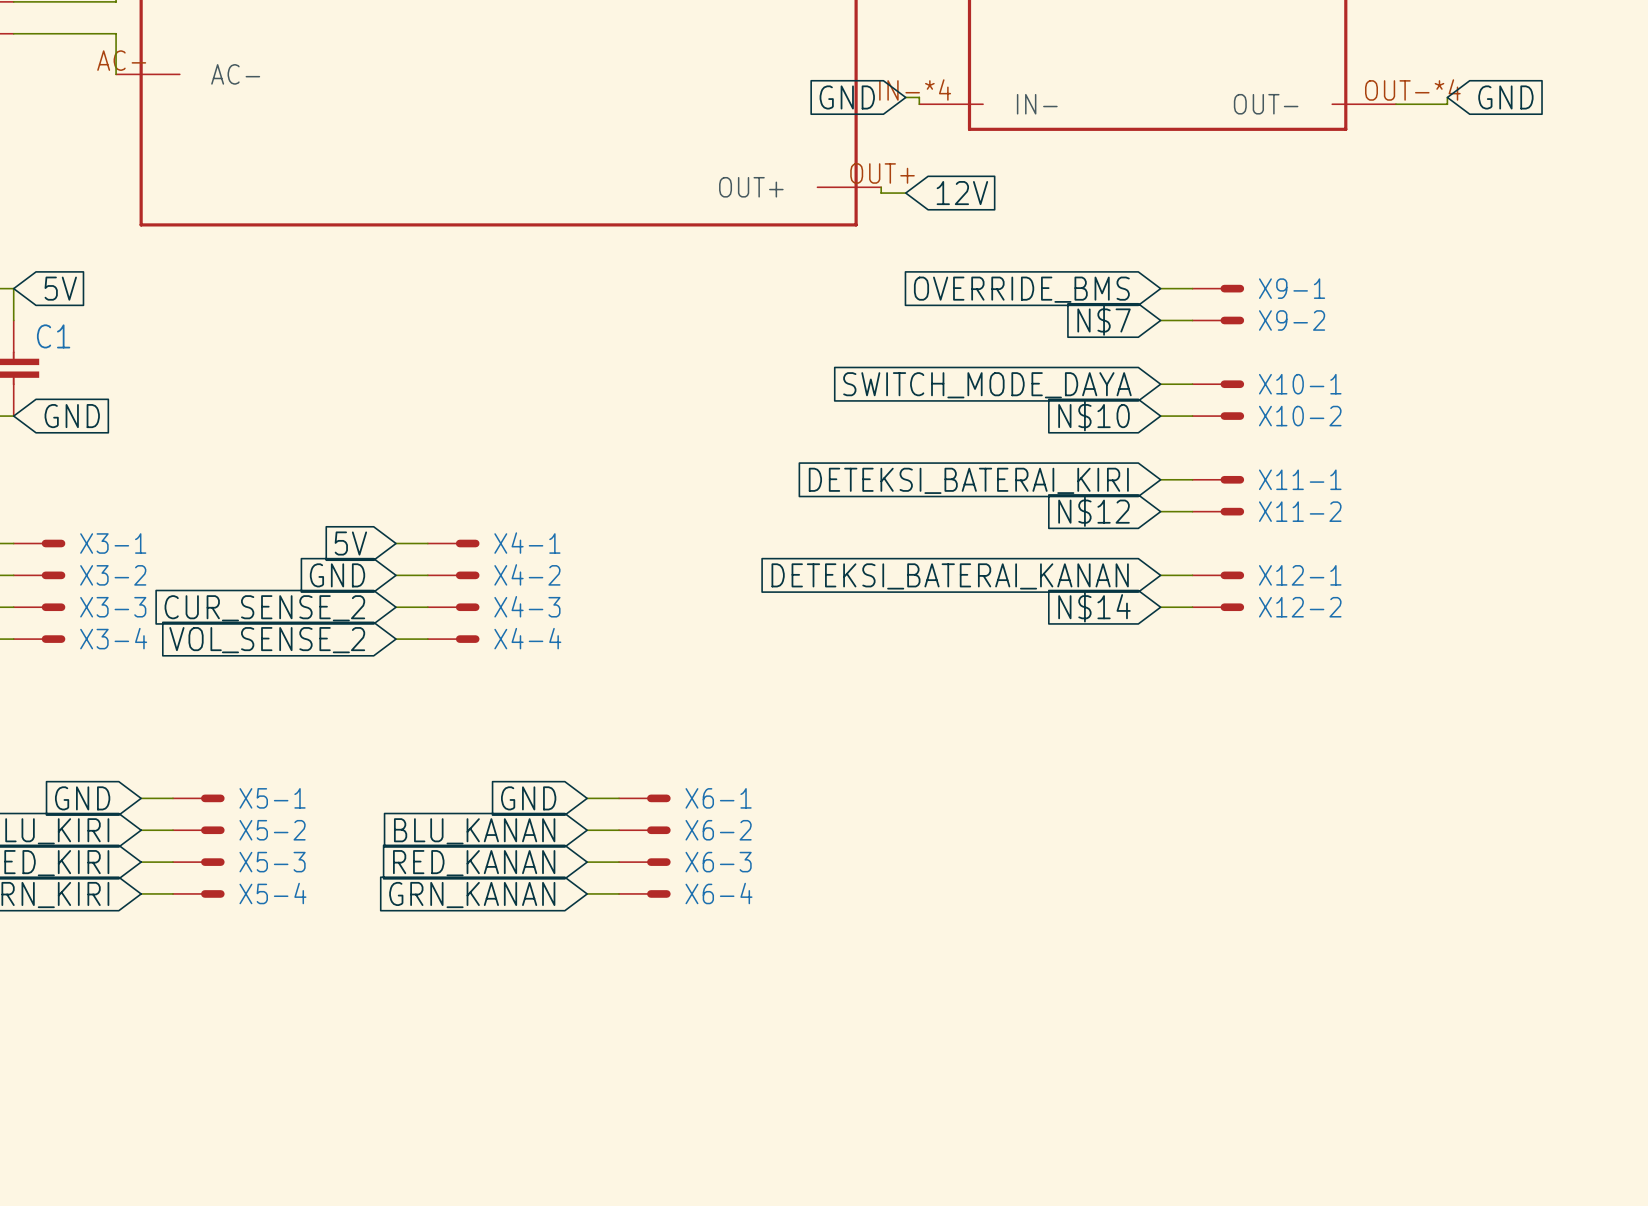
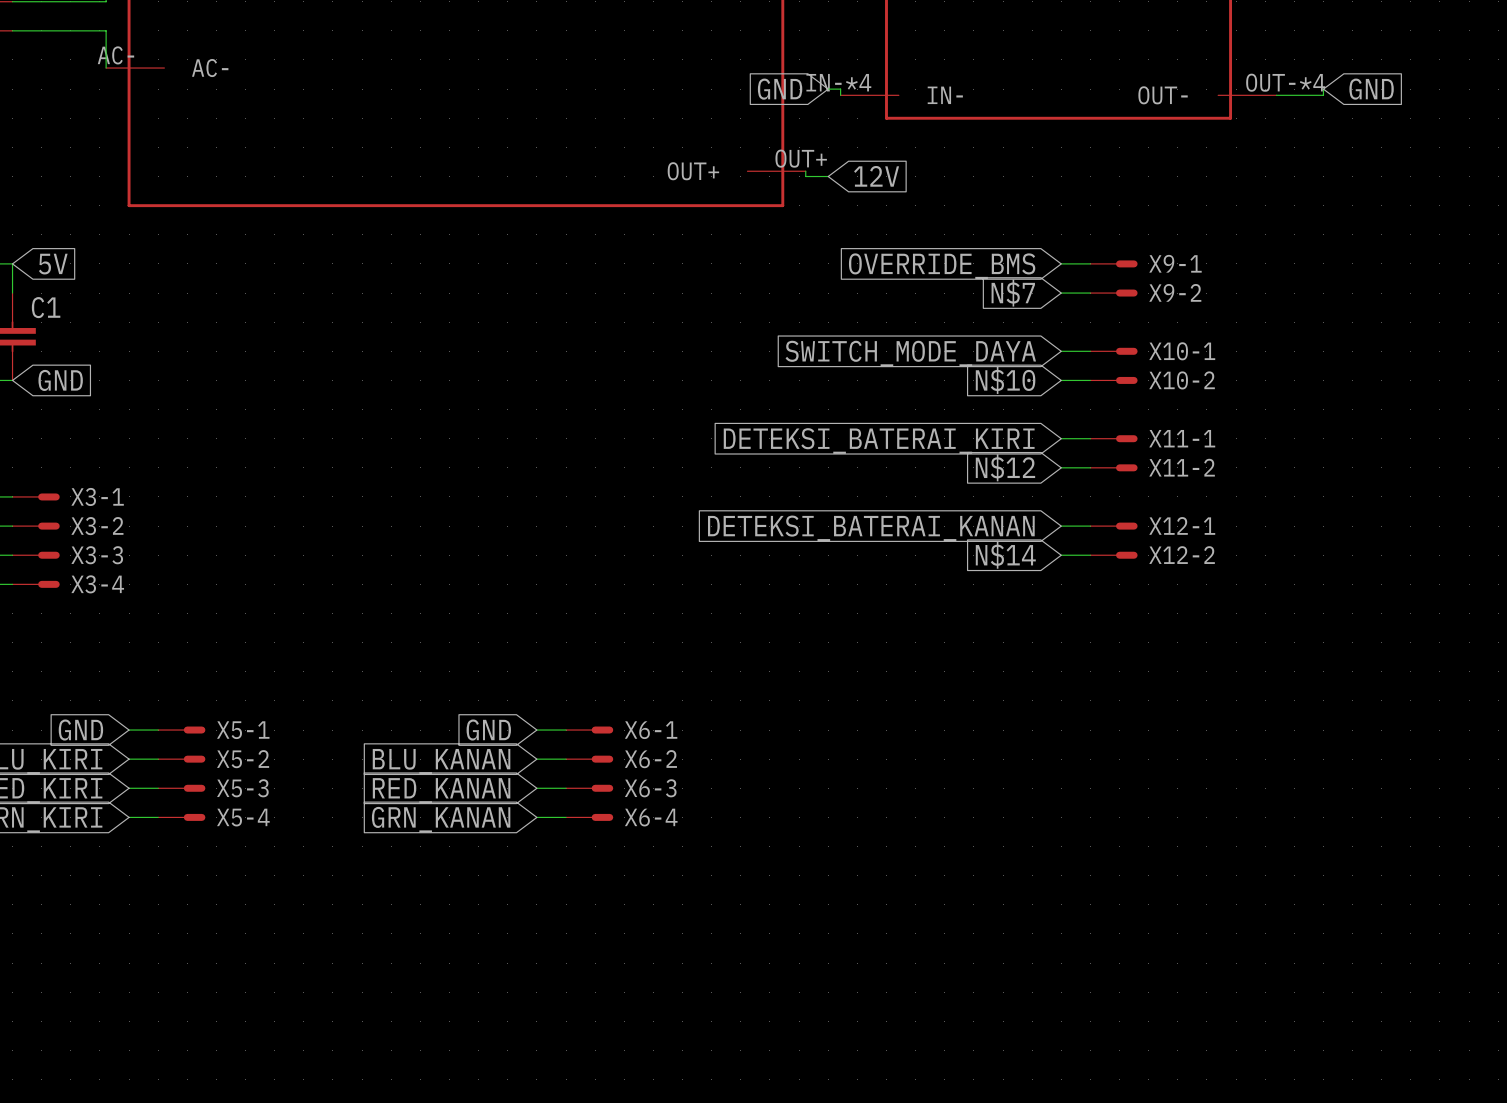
global label: 5V (350, 543) -> none
wire: (396, 543) (427, 543) -> none
X4-1: (453, 543) -> none
global label: GND (337, 575) -> none
wire: (396, 575) (427, 575) -> none
X4-2: (453, 575) -> none
wire: (396, 607) (427, 607) -> none
X4-3: (453, 607) -> none
global label: CUR_SENSE_2 (264, 608) -> none
wire: (396, 639) (427, 639) -> none
X4-4: (453, 639) -> none
global label: VOL_SENSE_2 (267, 640) -> none

